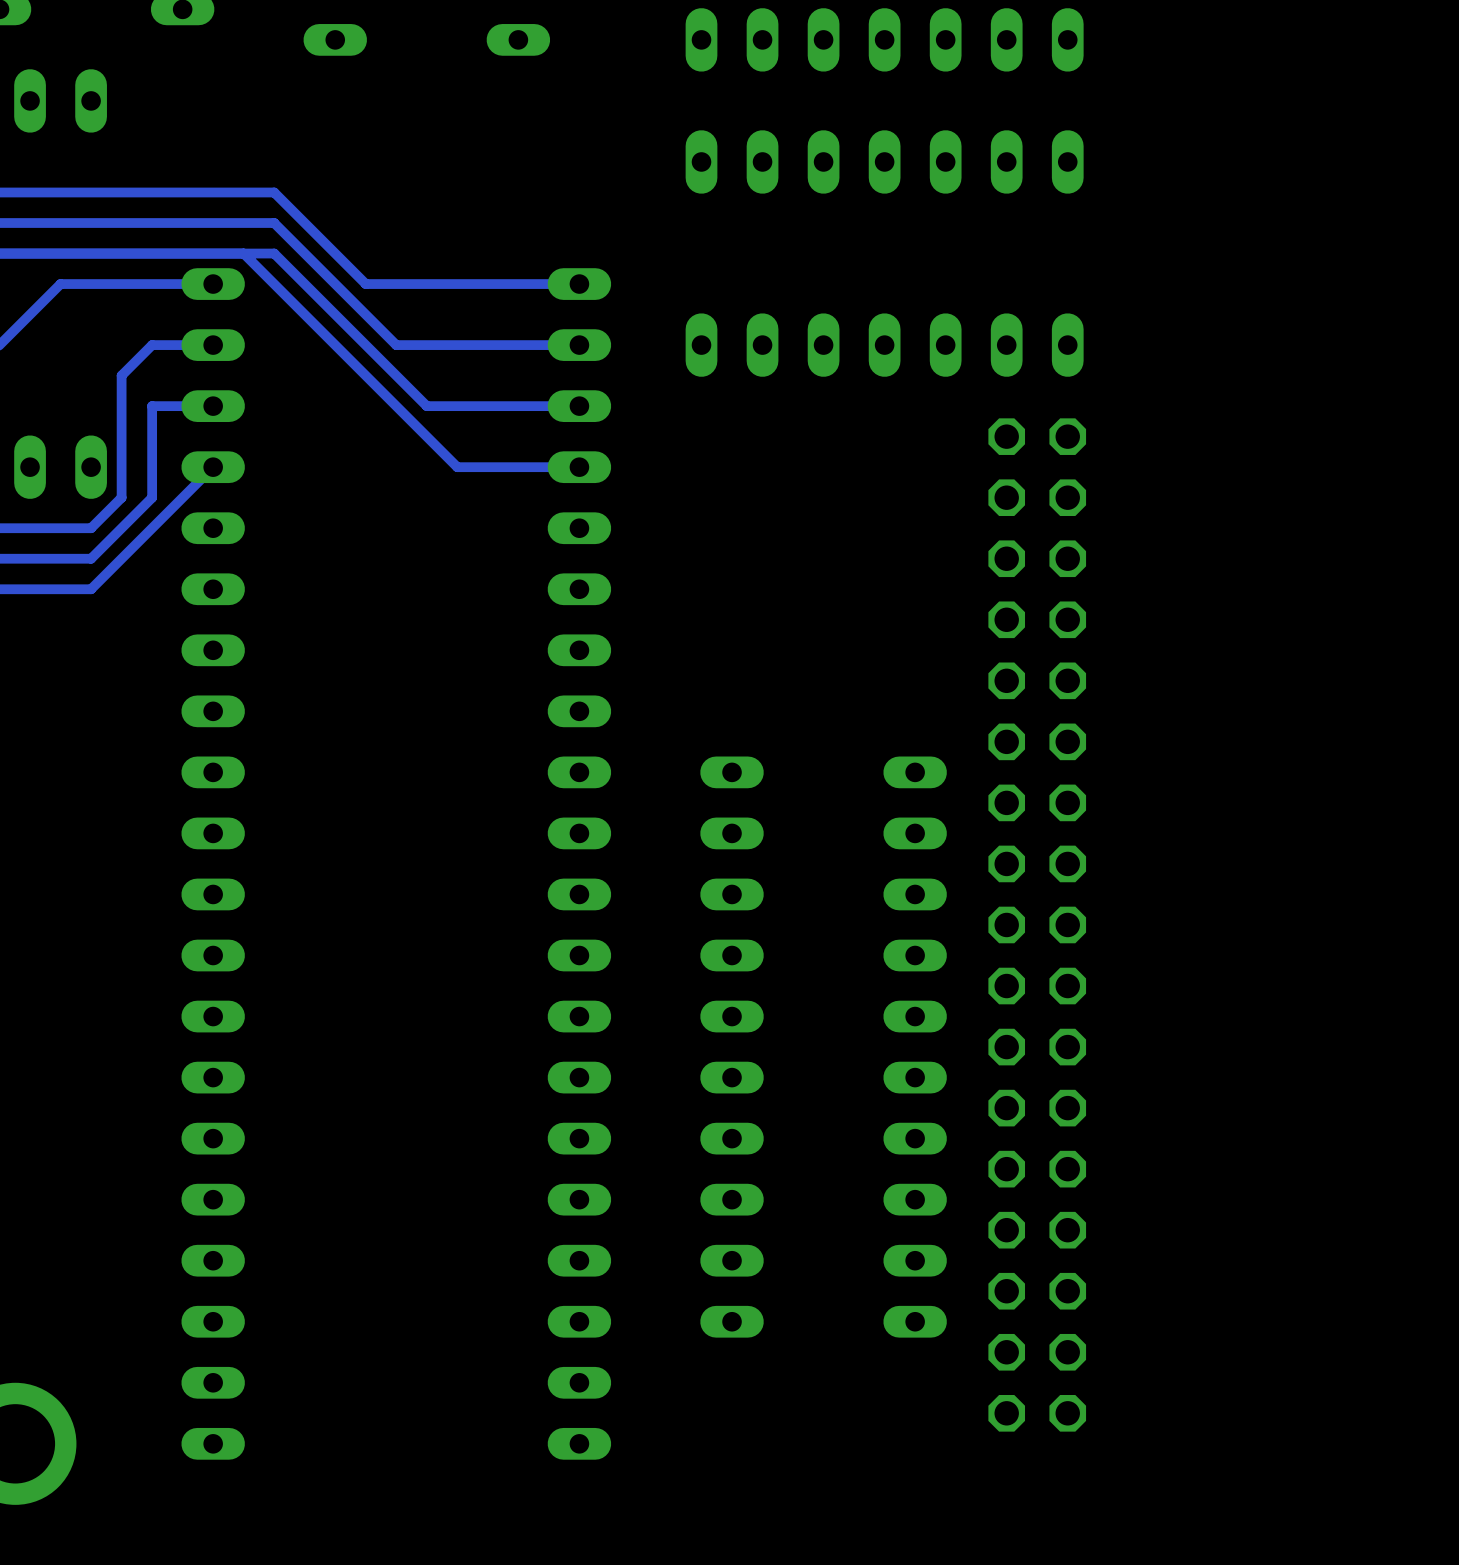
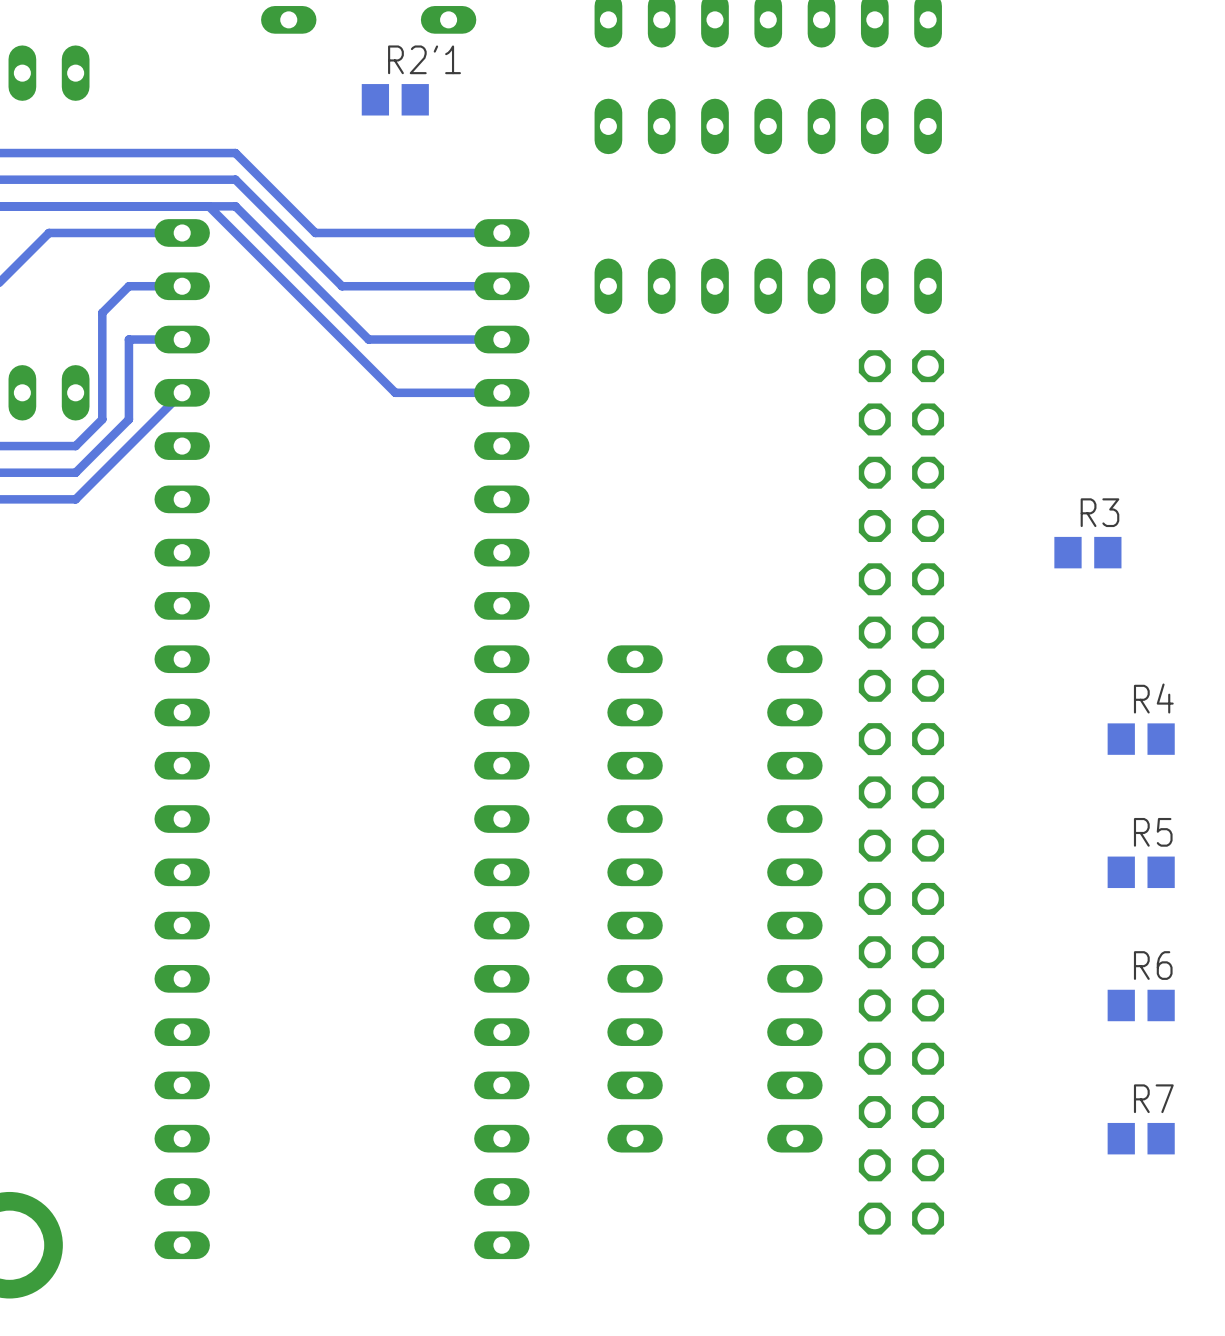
R2'1: none -> (395, 99)
R3: none -> (1087, 552)
R4: none -> (1141, 739)
R5: none -> (1141, 872)
R6: none -> (1141, 1005)
R7: none -> (1141, 1138)

